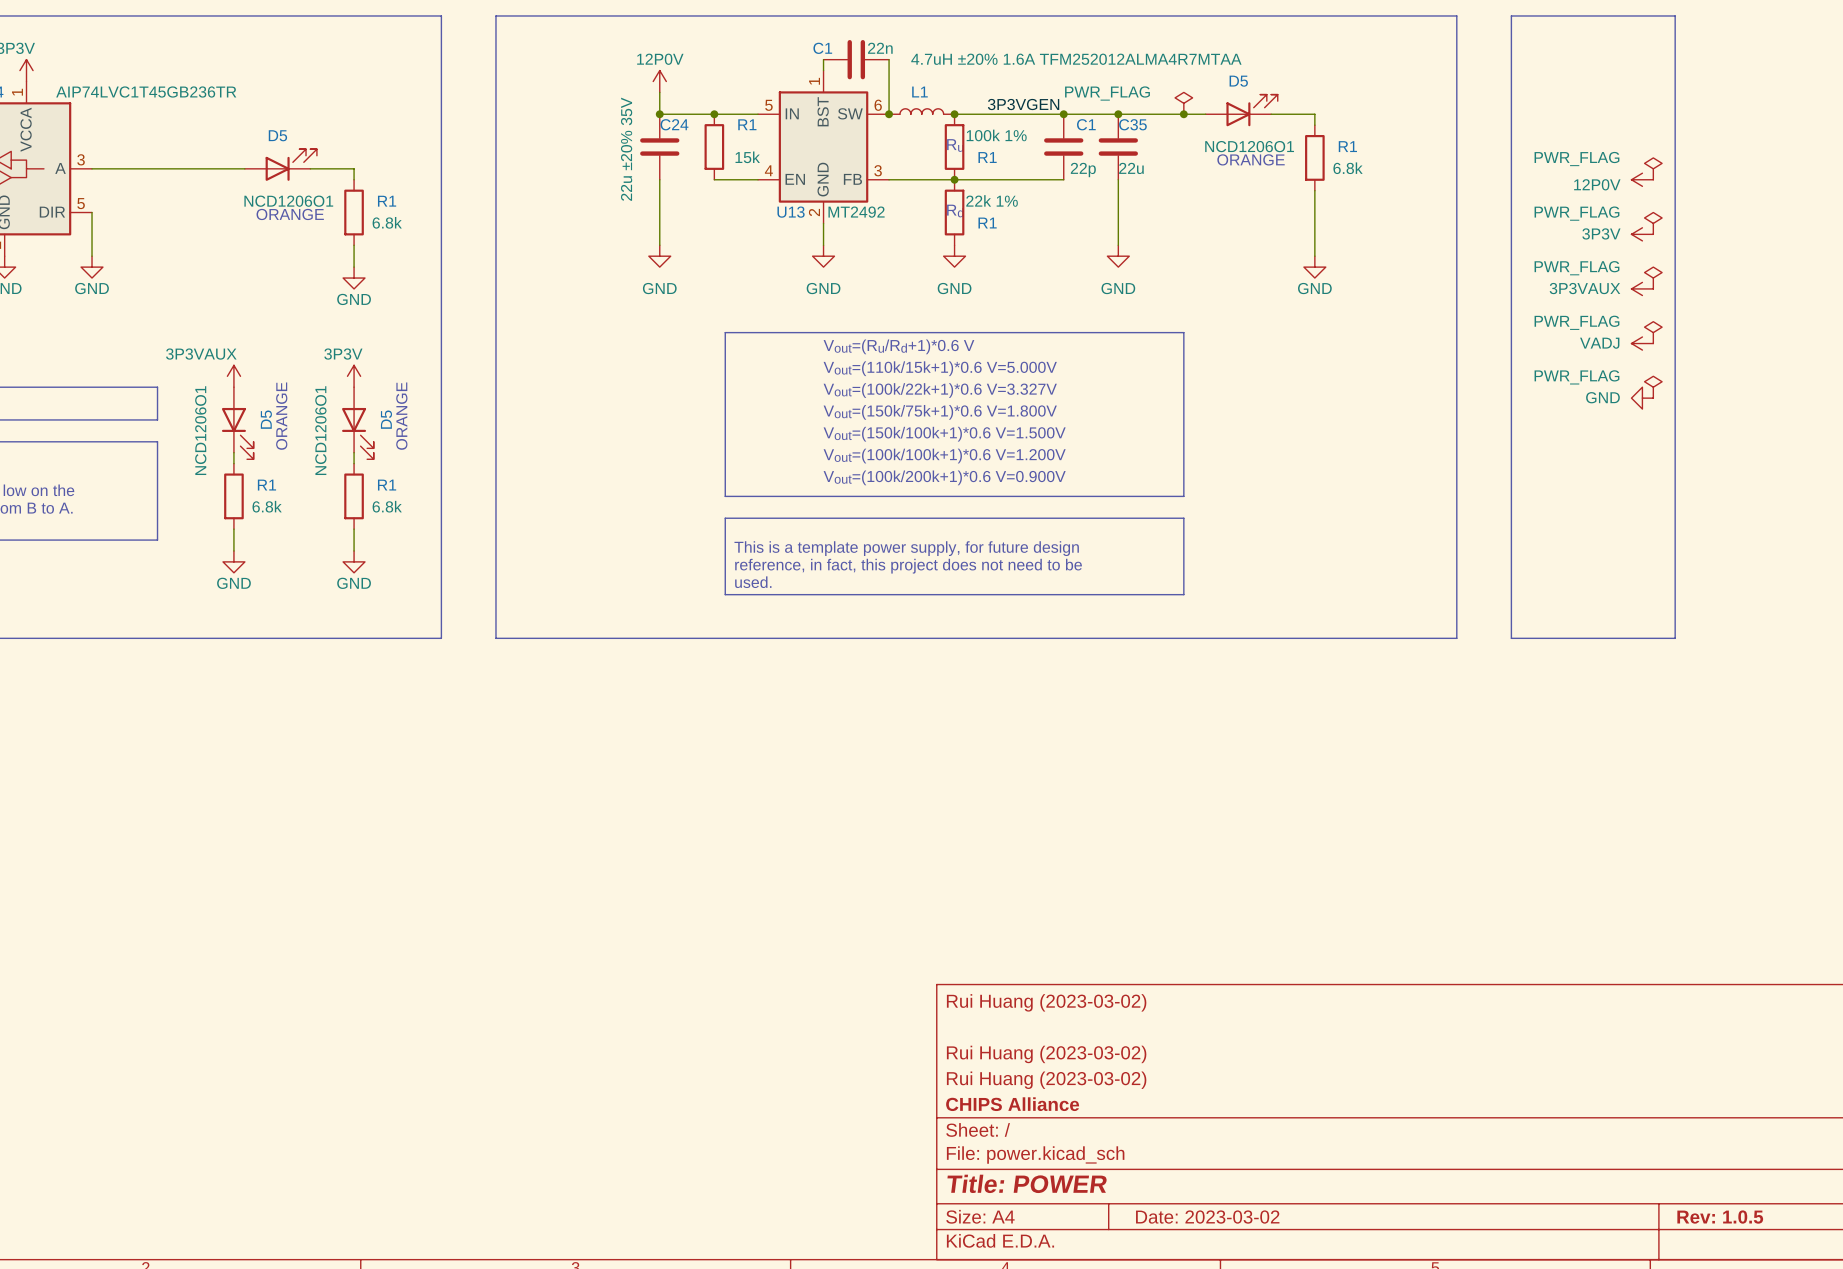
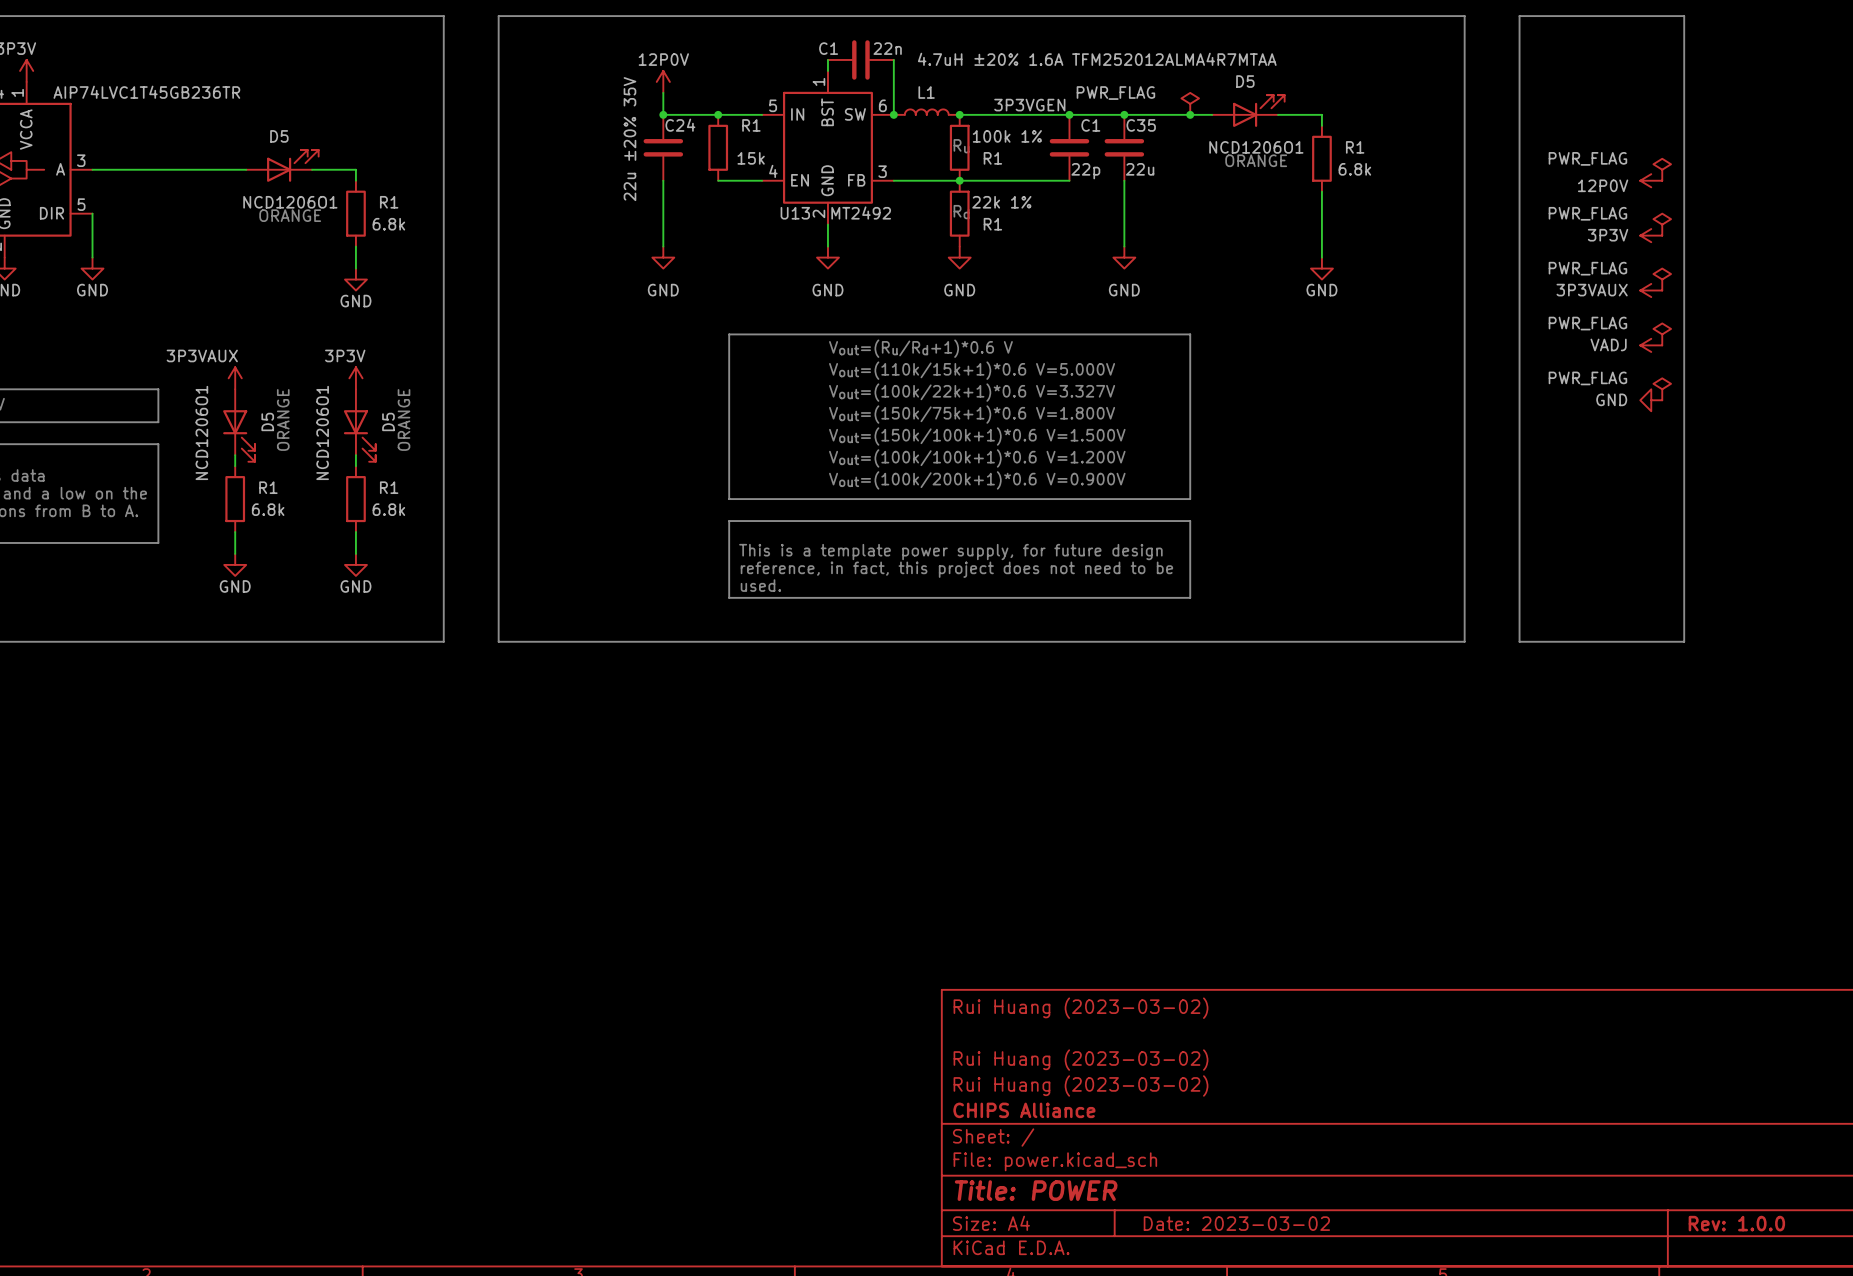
title block: Rev: 1.0.5 (1720, 1217) -> Rev: 1.0.0 (1736, 1223)

